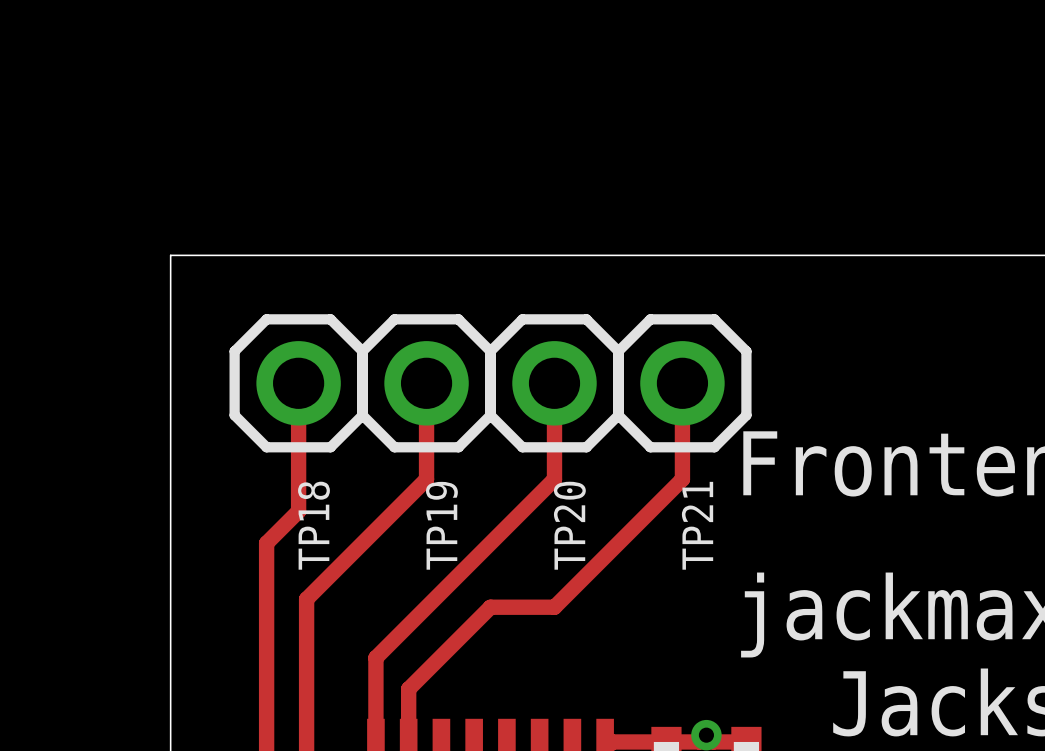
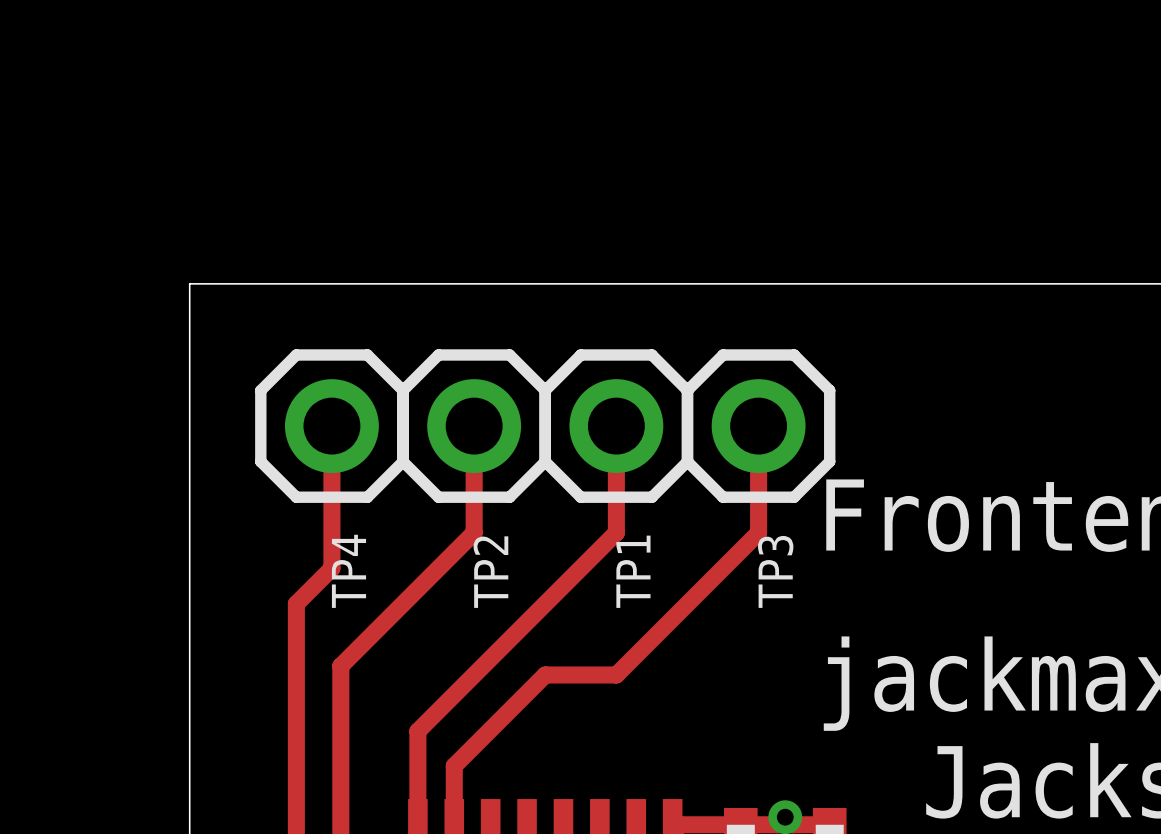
TP18 name: TP18 (313, 525) -> TP4 (348, 571)
TP19 name: TP19 (441, 525) -> TP2 (490, 572)
TP20 name: TP20 (569, 525) -> TP1 (633, 571)
TP21 name: TP21 (697, 525) -> TP3 (775, 571)

